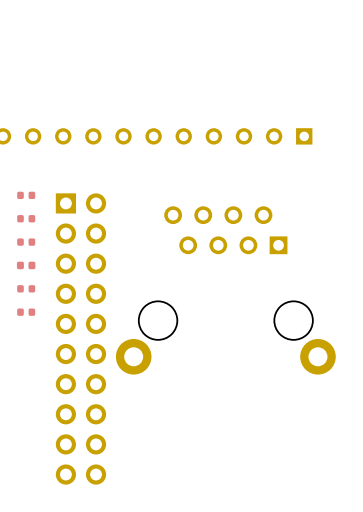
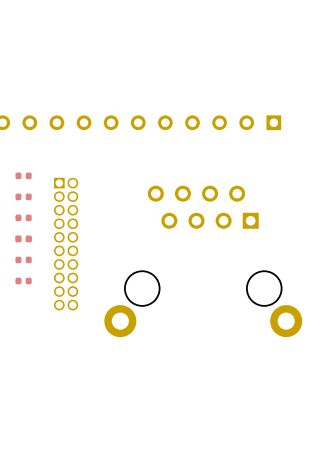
part: none -> (66, 244)
part: (80, 338) -> none

